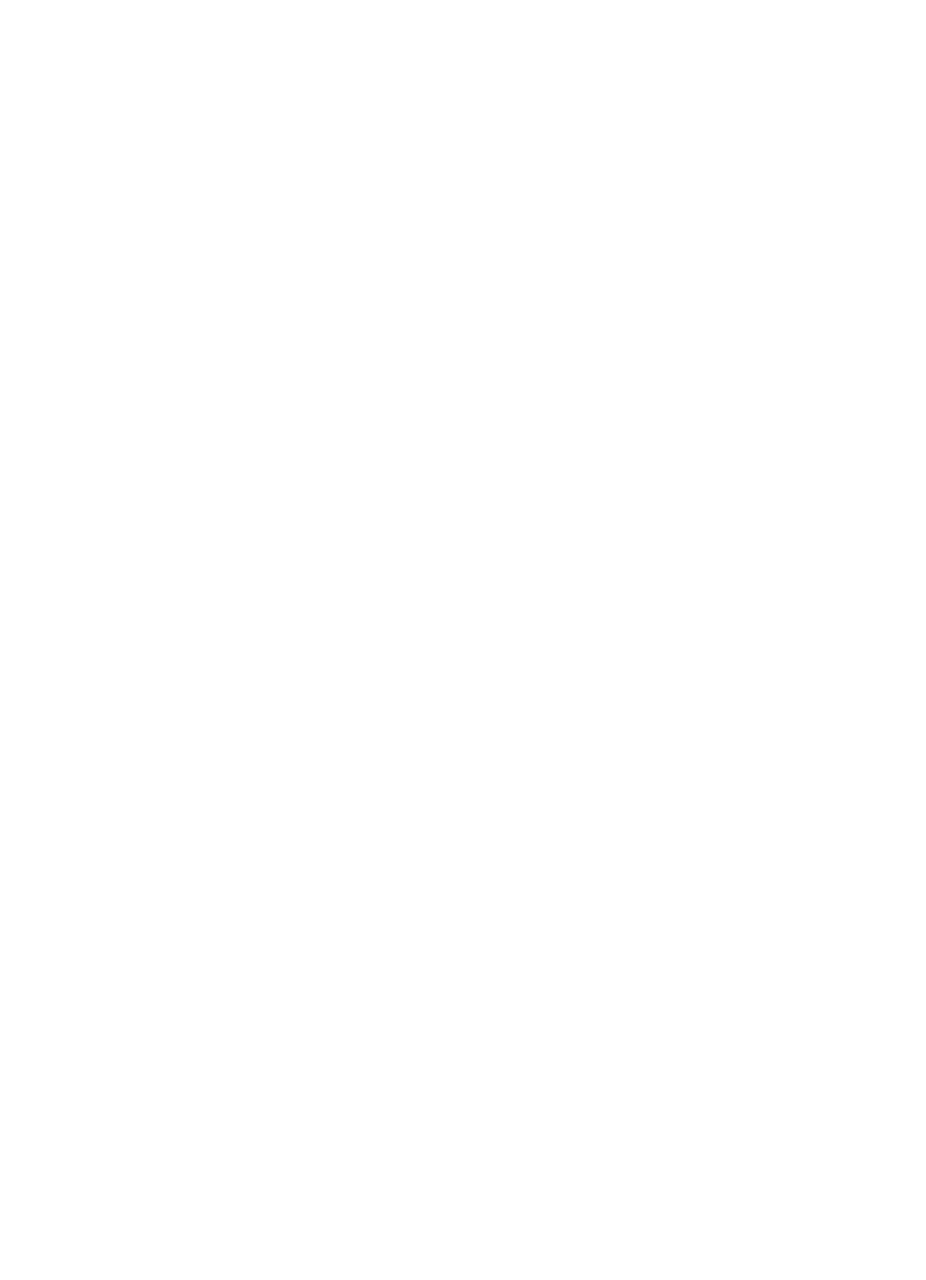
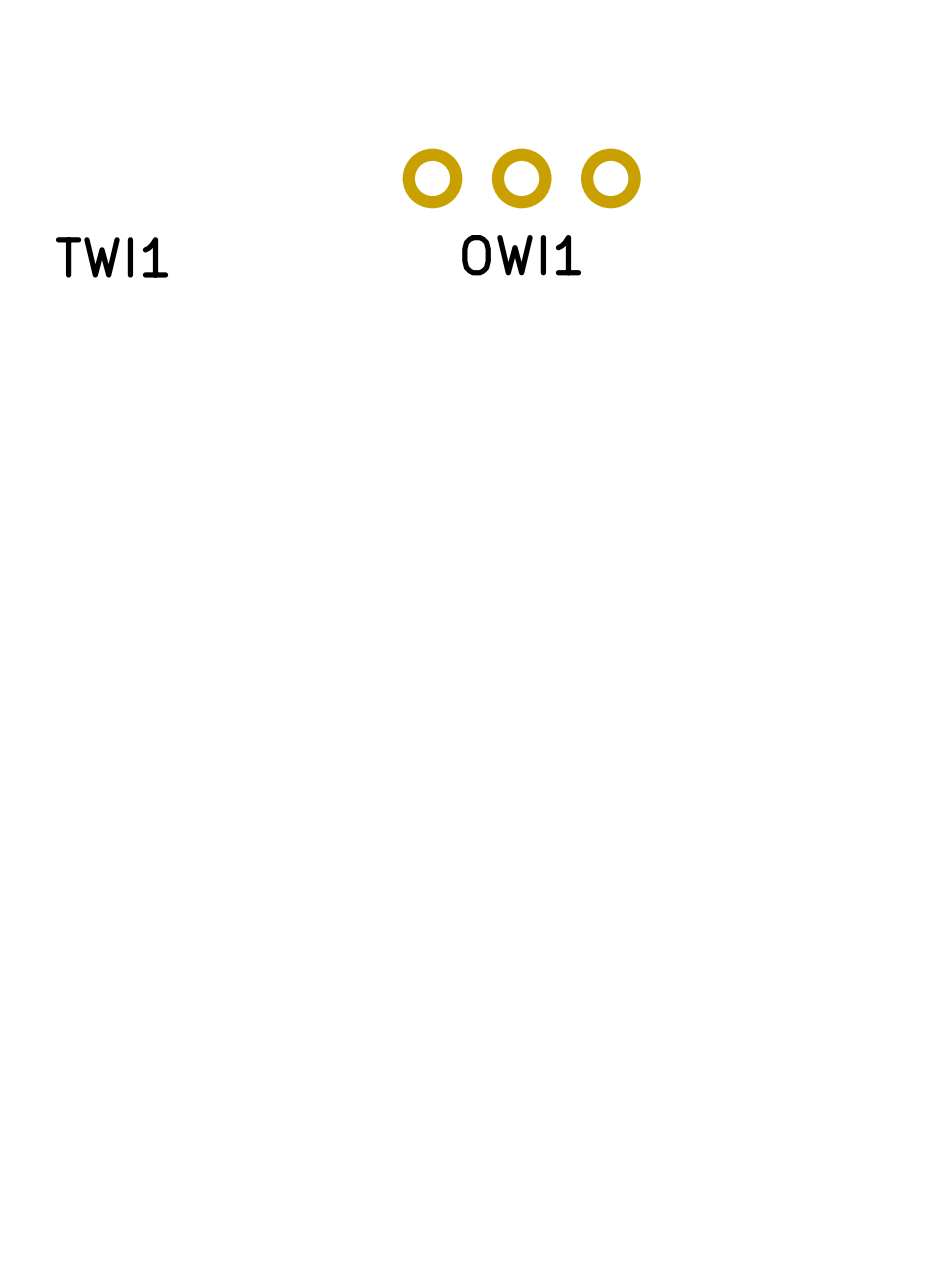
part: none -> (521, 178)
text: none -> OWI1 (521, 255)
text: none -> TWI1 (112, 257)

